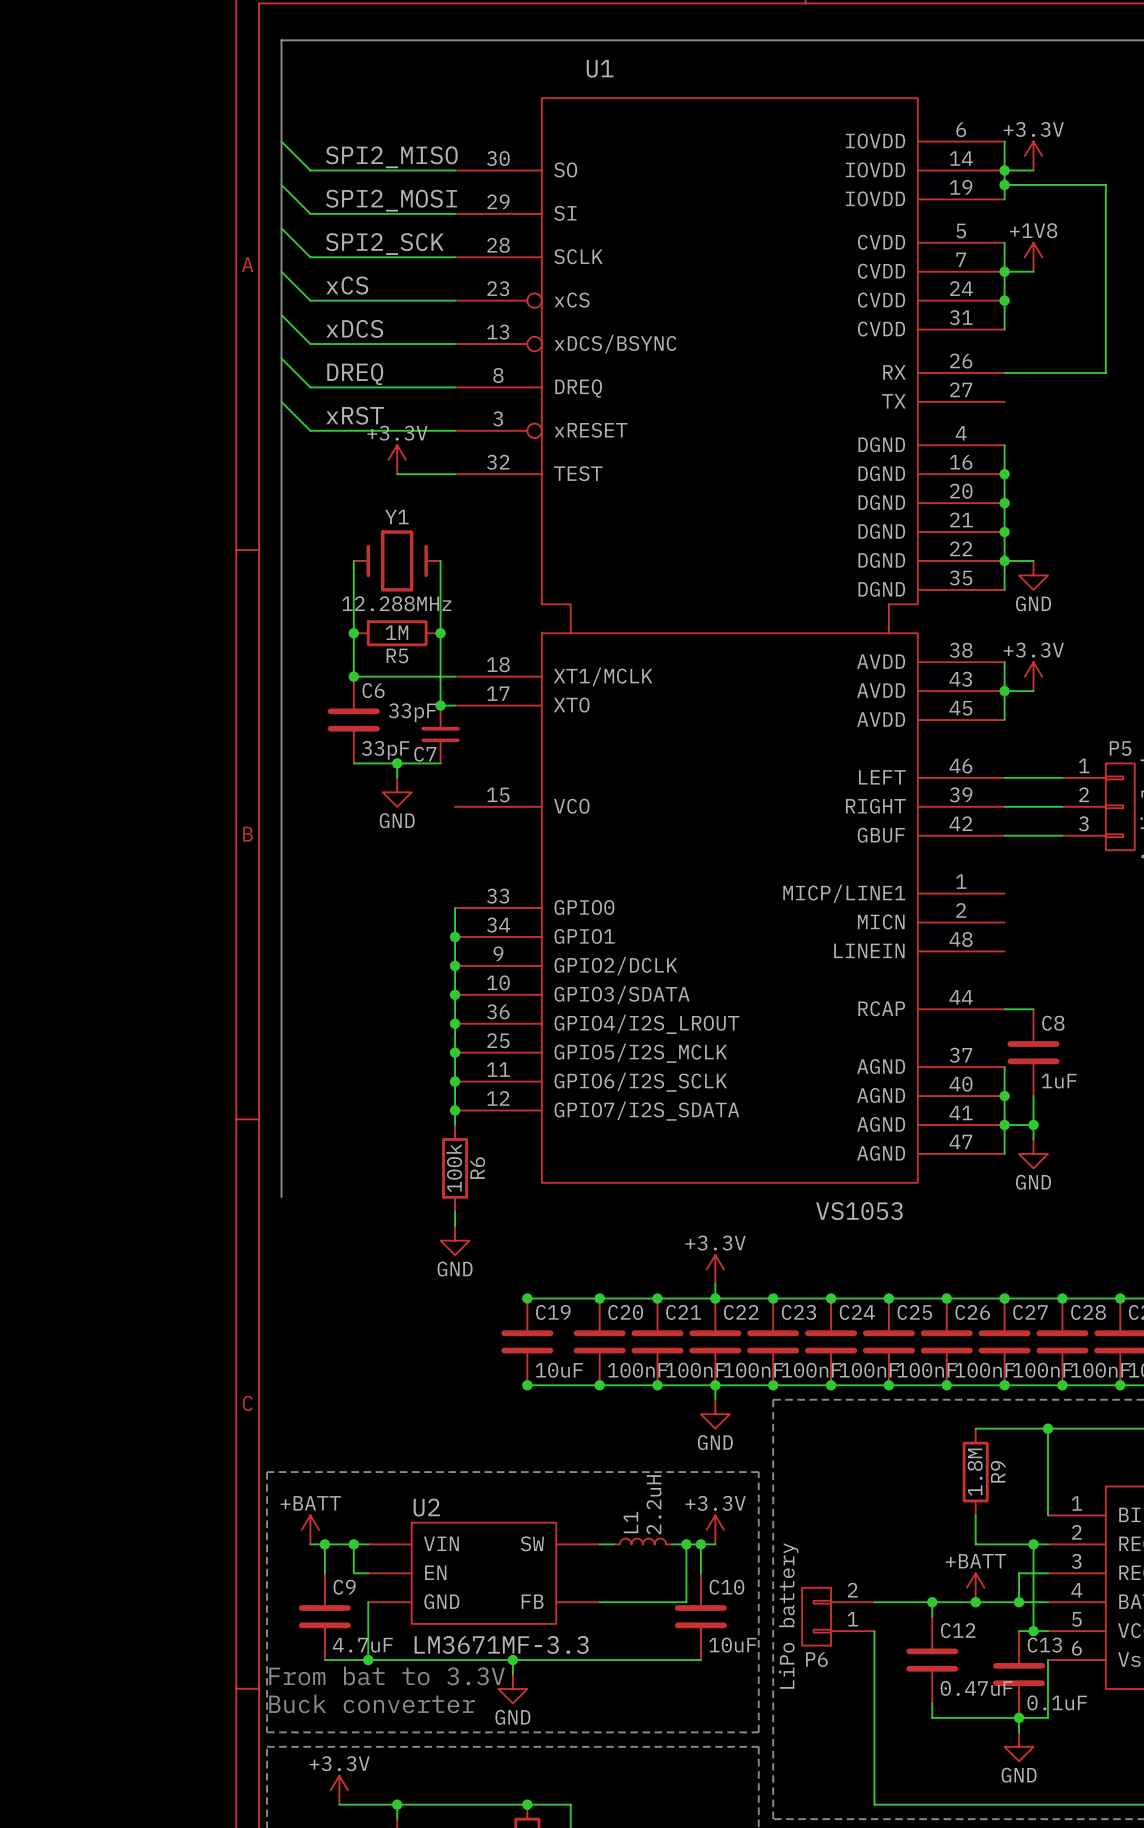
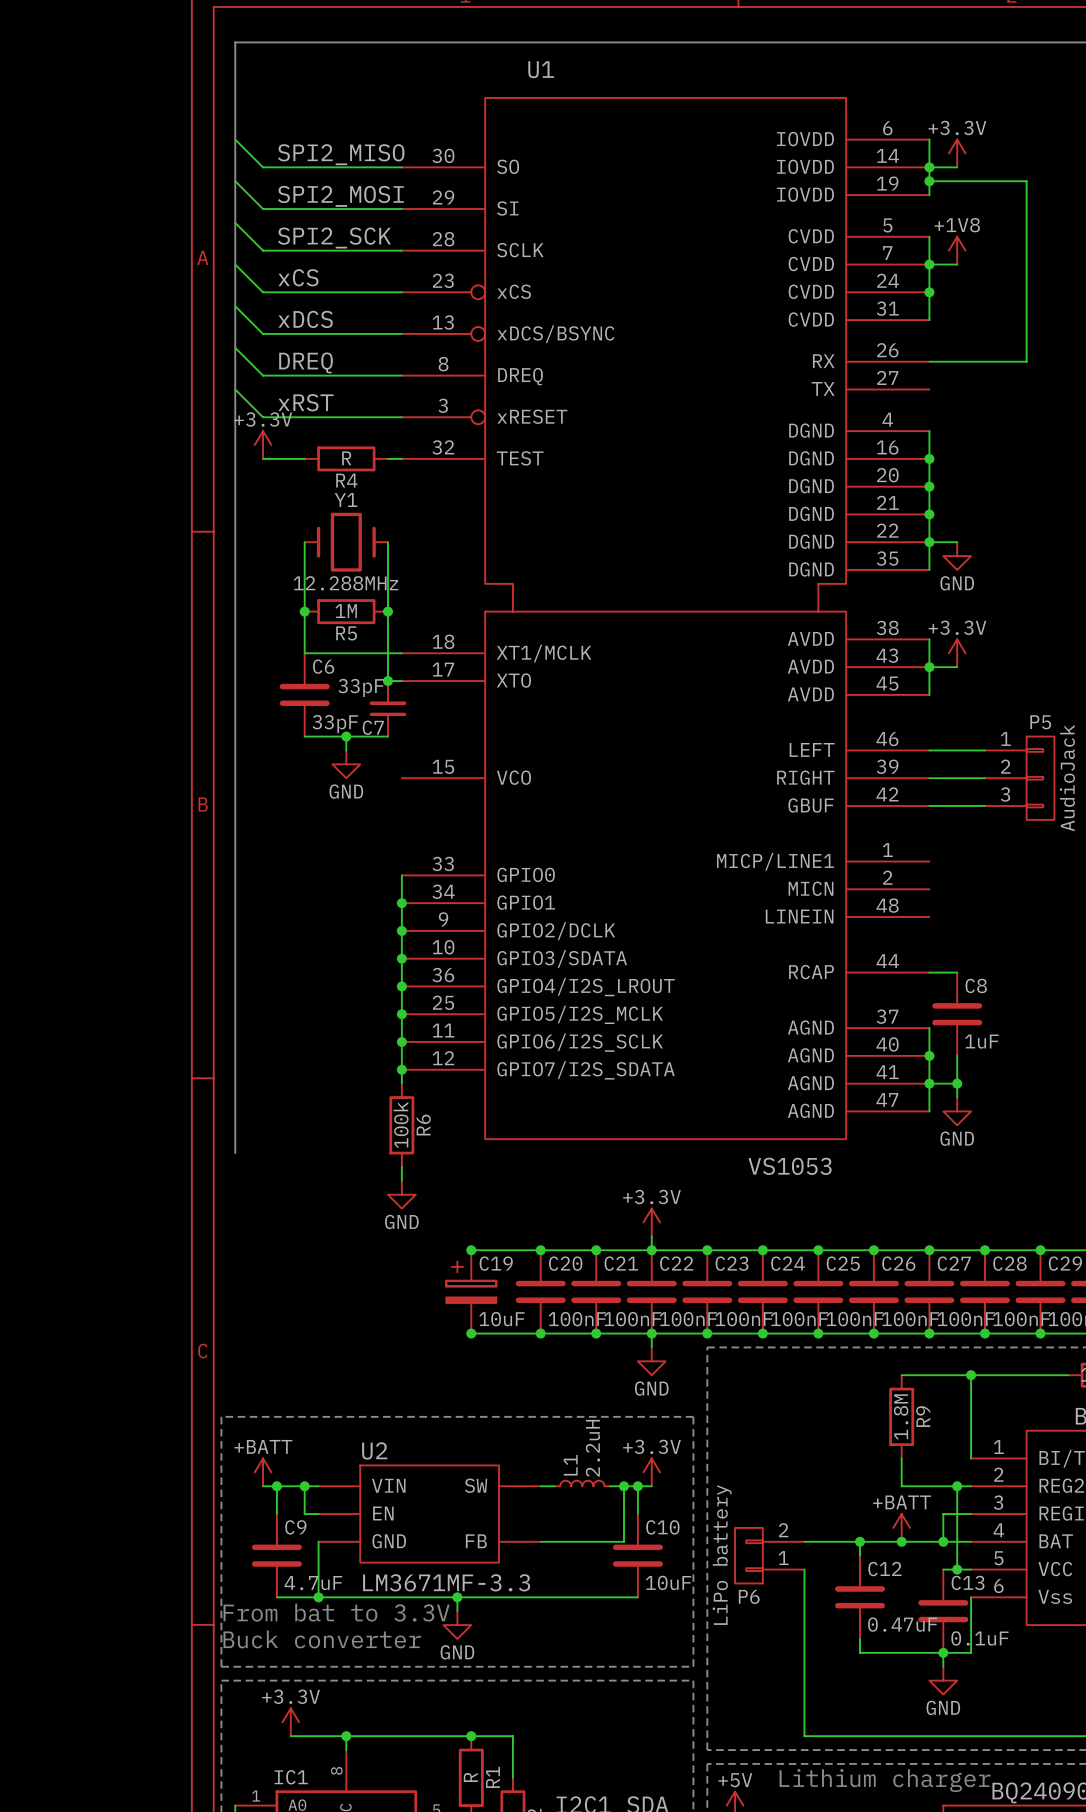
power symbol position: +3.3V (397, 459) -> +3.3V (263, 445)
wire: (397, 474) (440, 474) -> (263, 458) (304, 458)
R4: none -> R (346, 458)
junction: (353, 676) -> none
C19 symbol: [501, 1298, 554, 1386] -> [446, 1250, 497, 1334]

